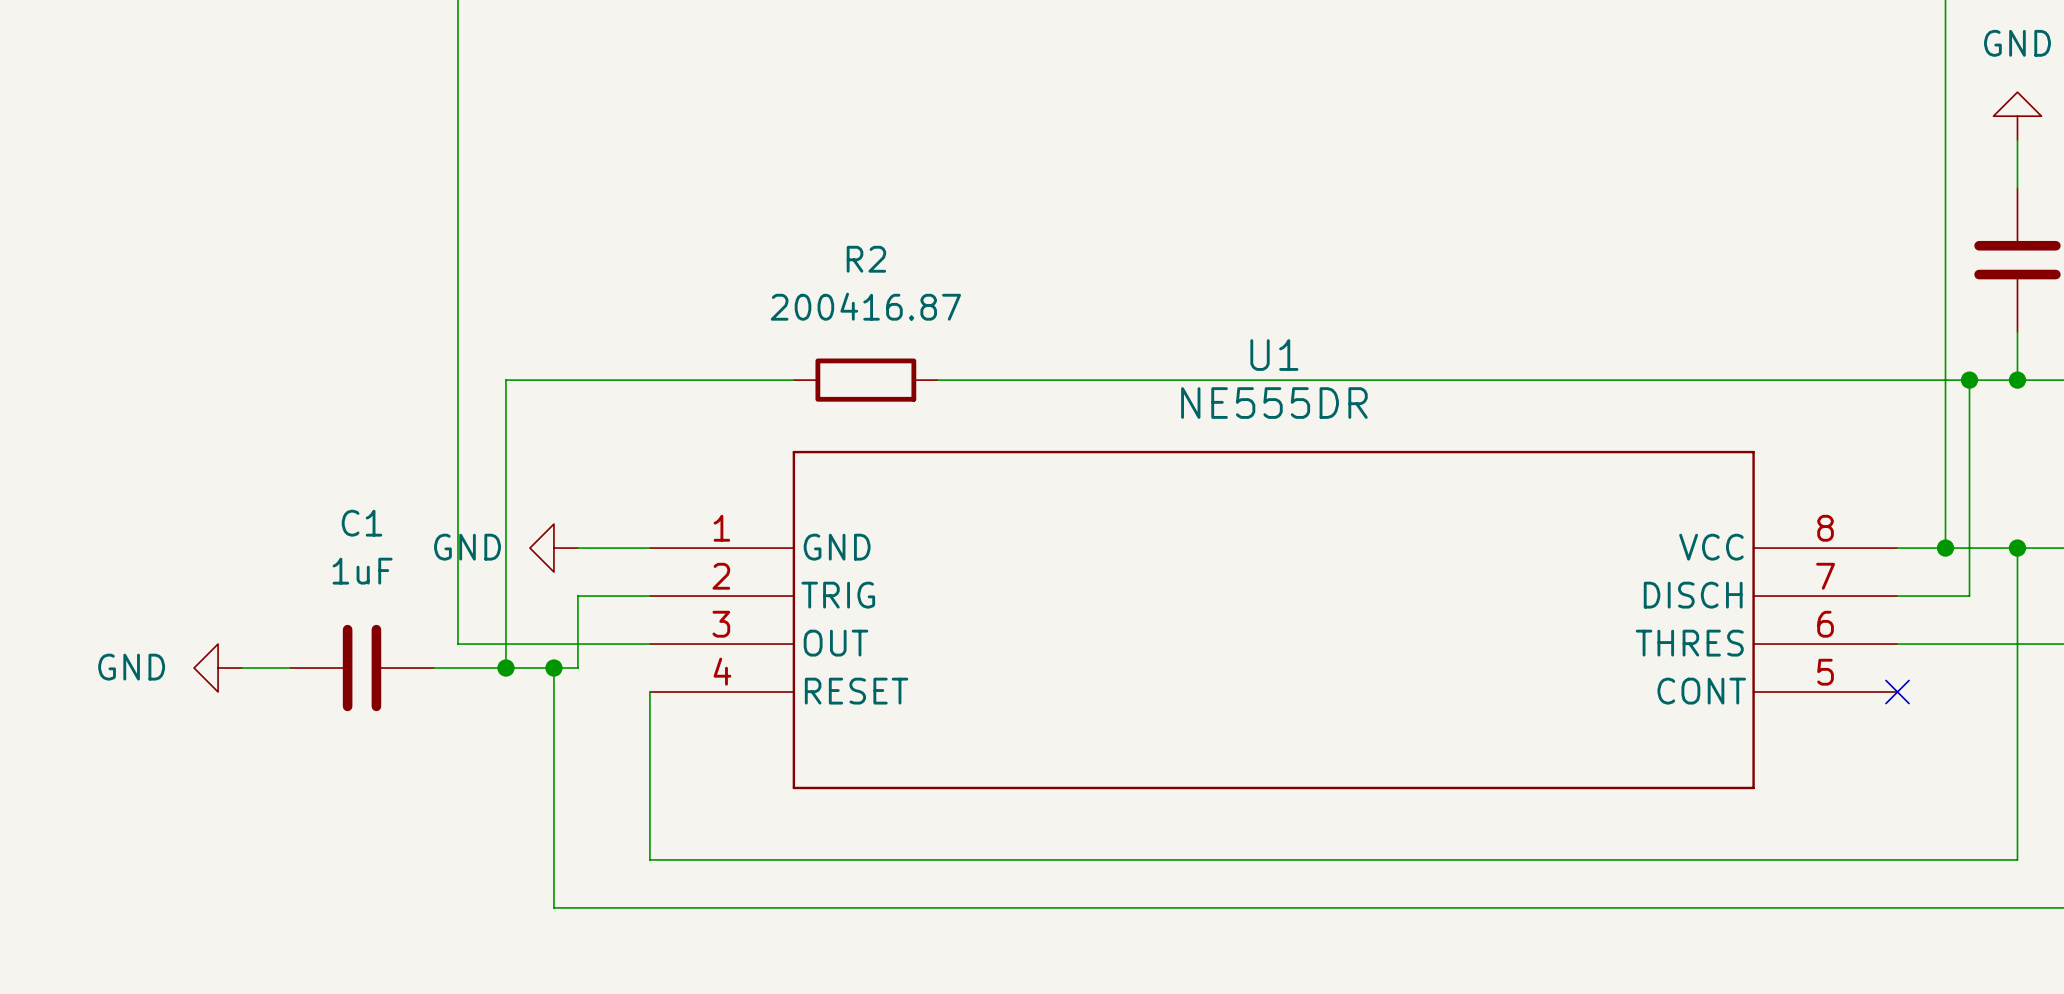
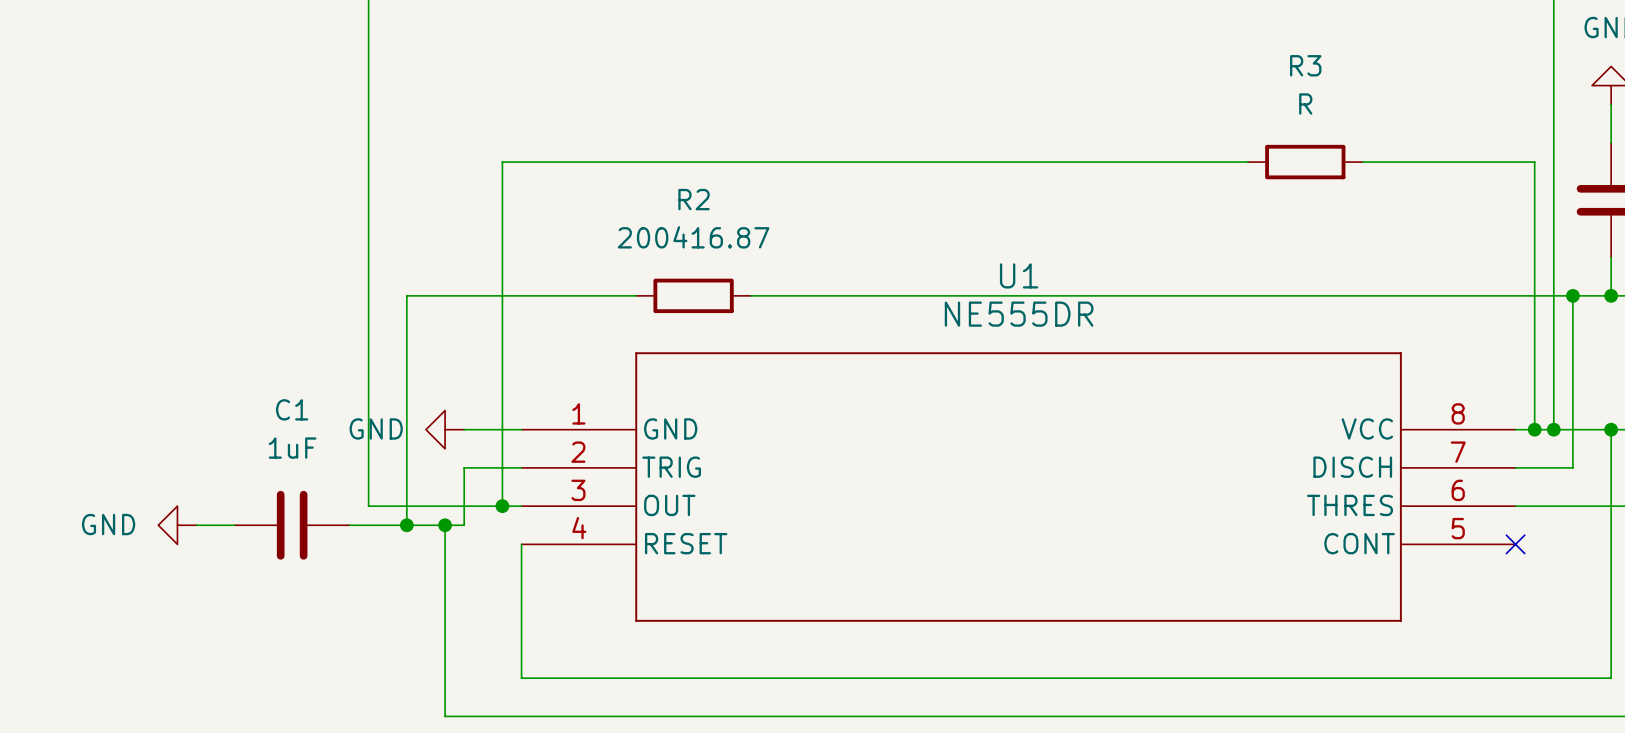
wire: none -> (1247, 162) (502, 162) (502, 506)
R3: none -> R (1305, 162)
wire: none -> (1362, 162) (1534, 162) (1534, 429)
junction: none -> (1534, 429)
junction: none -> (502, 506)

